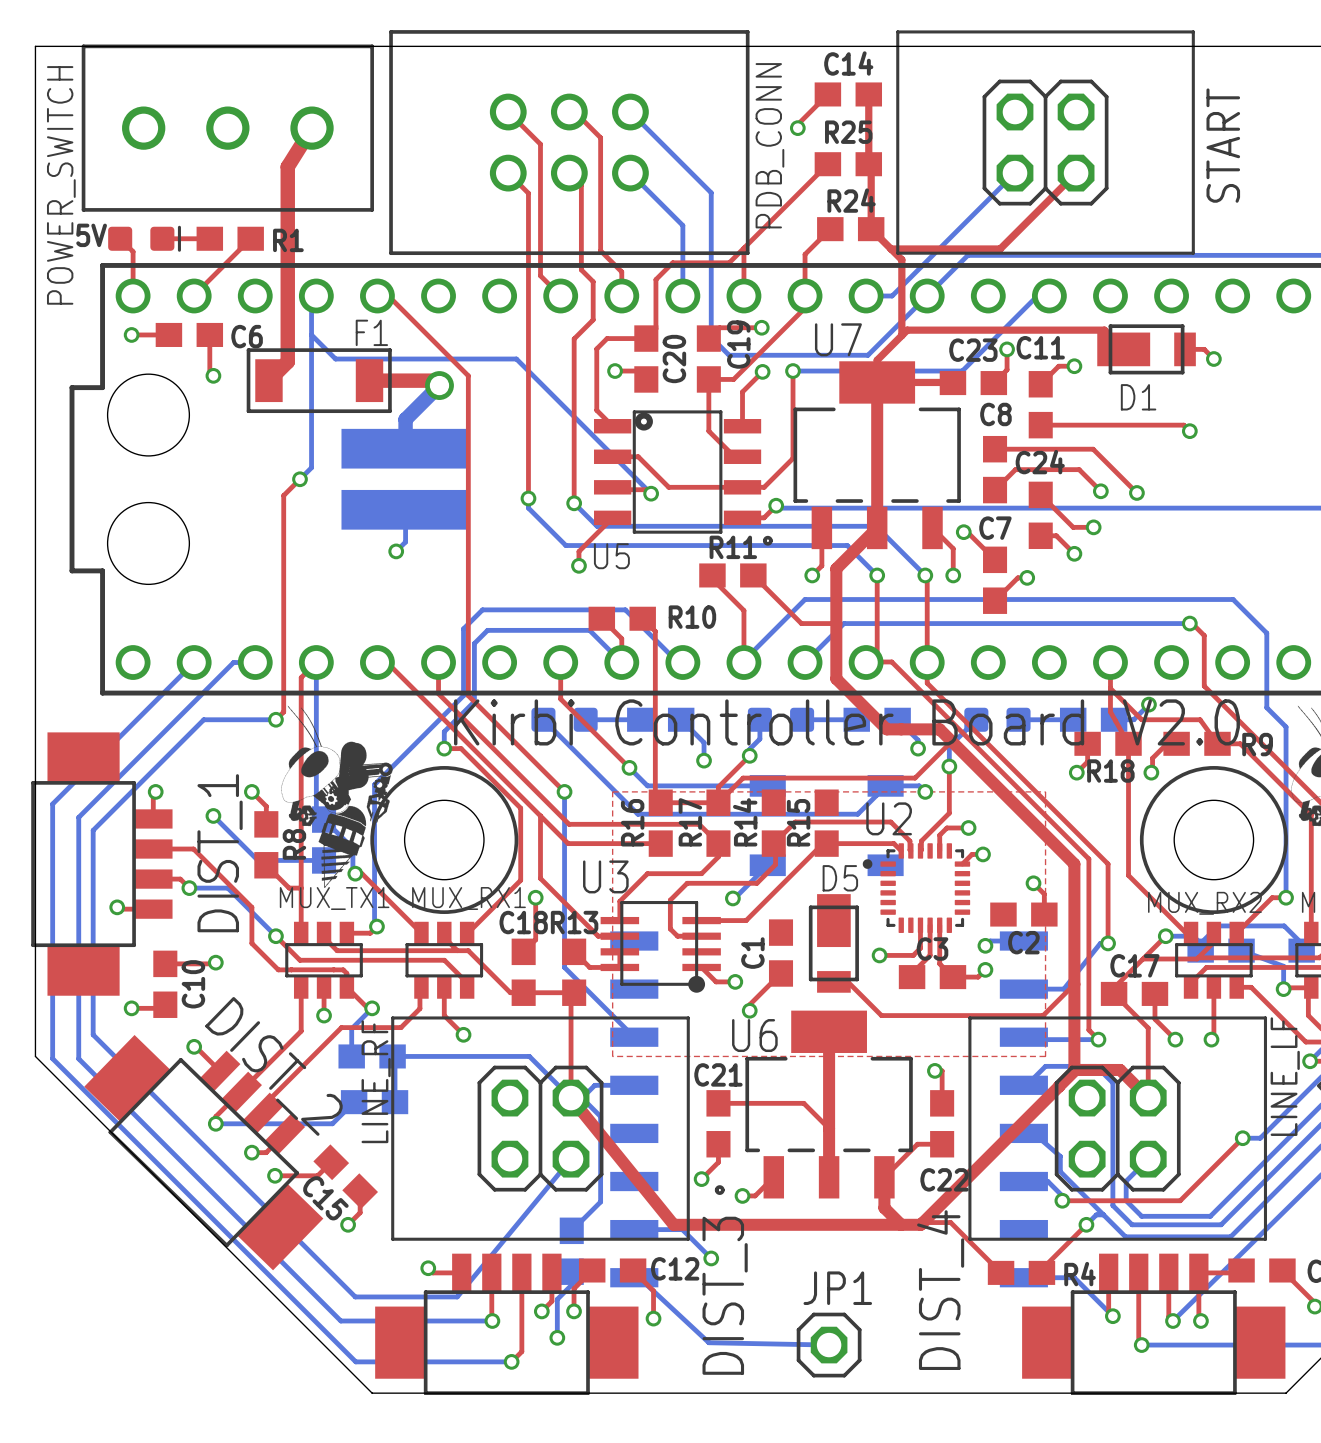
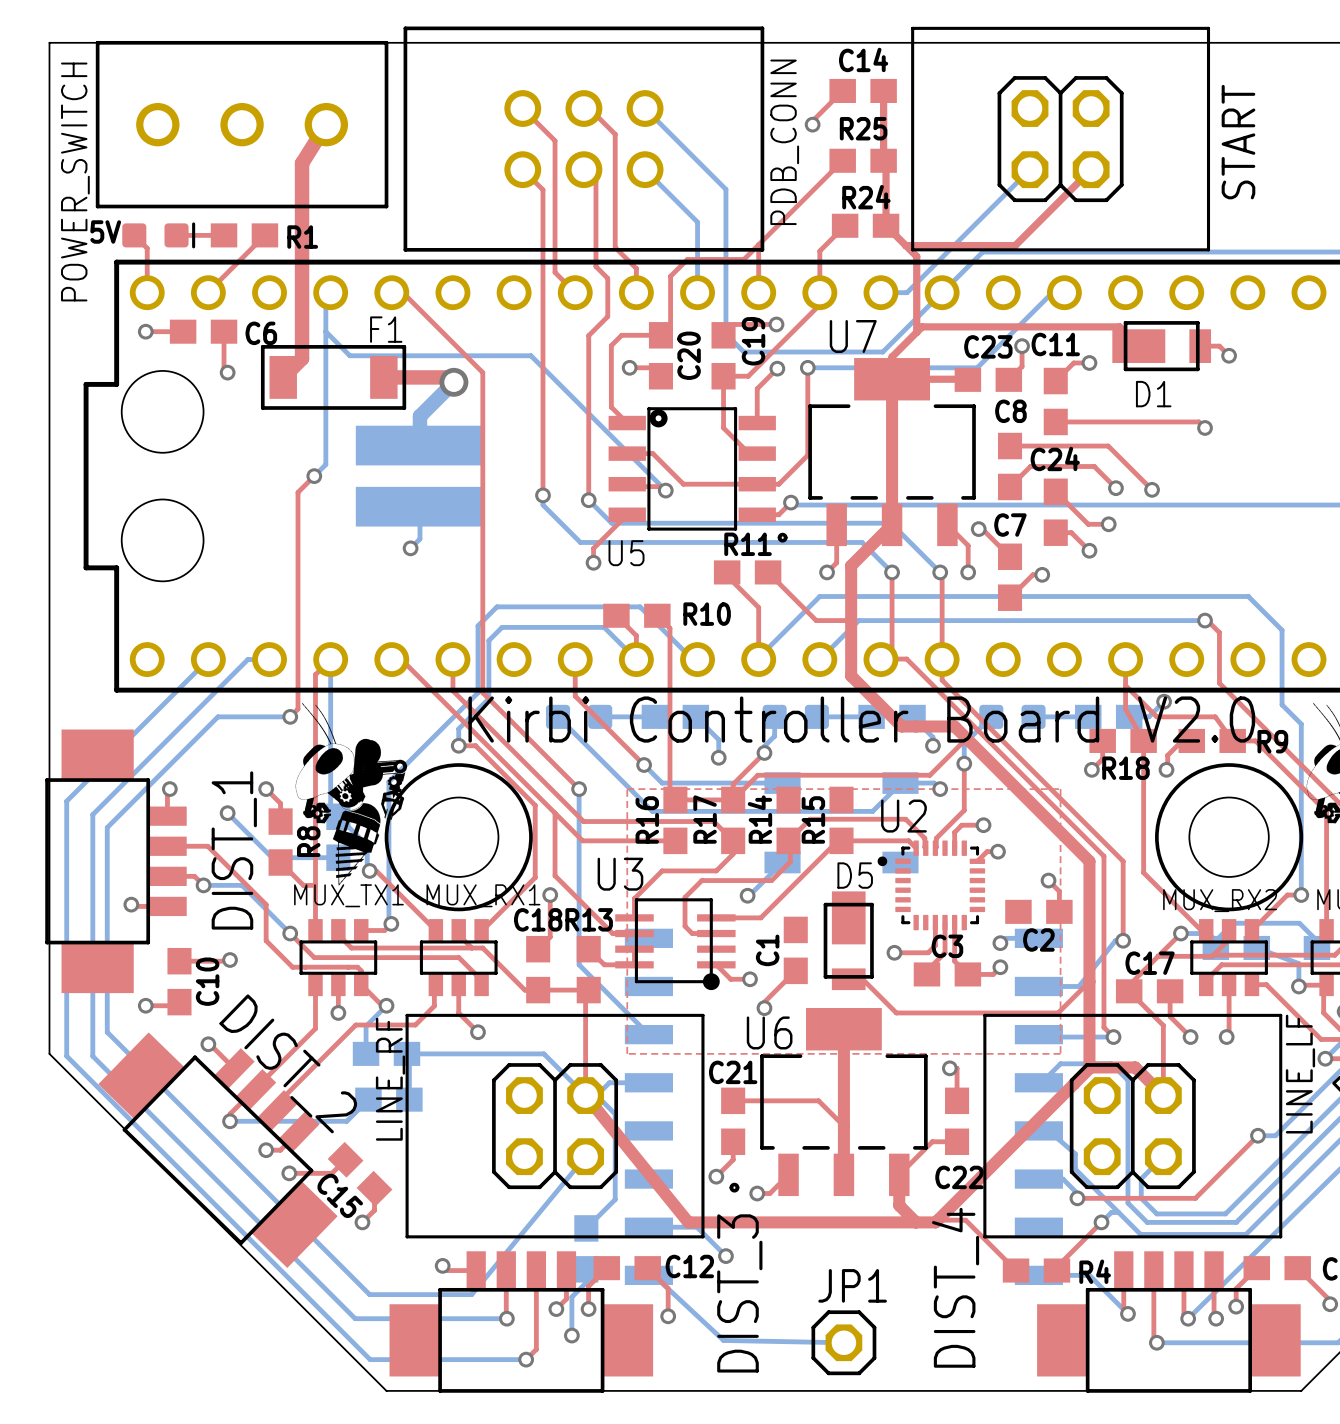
top track: (1198, 1272) (1239, 1272) -> (1236, 1306) (1236, 1288) (1254, 1270)
via: none -> (1236, 1306)

